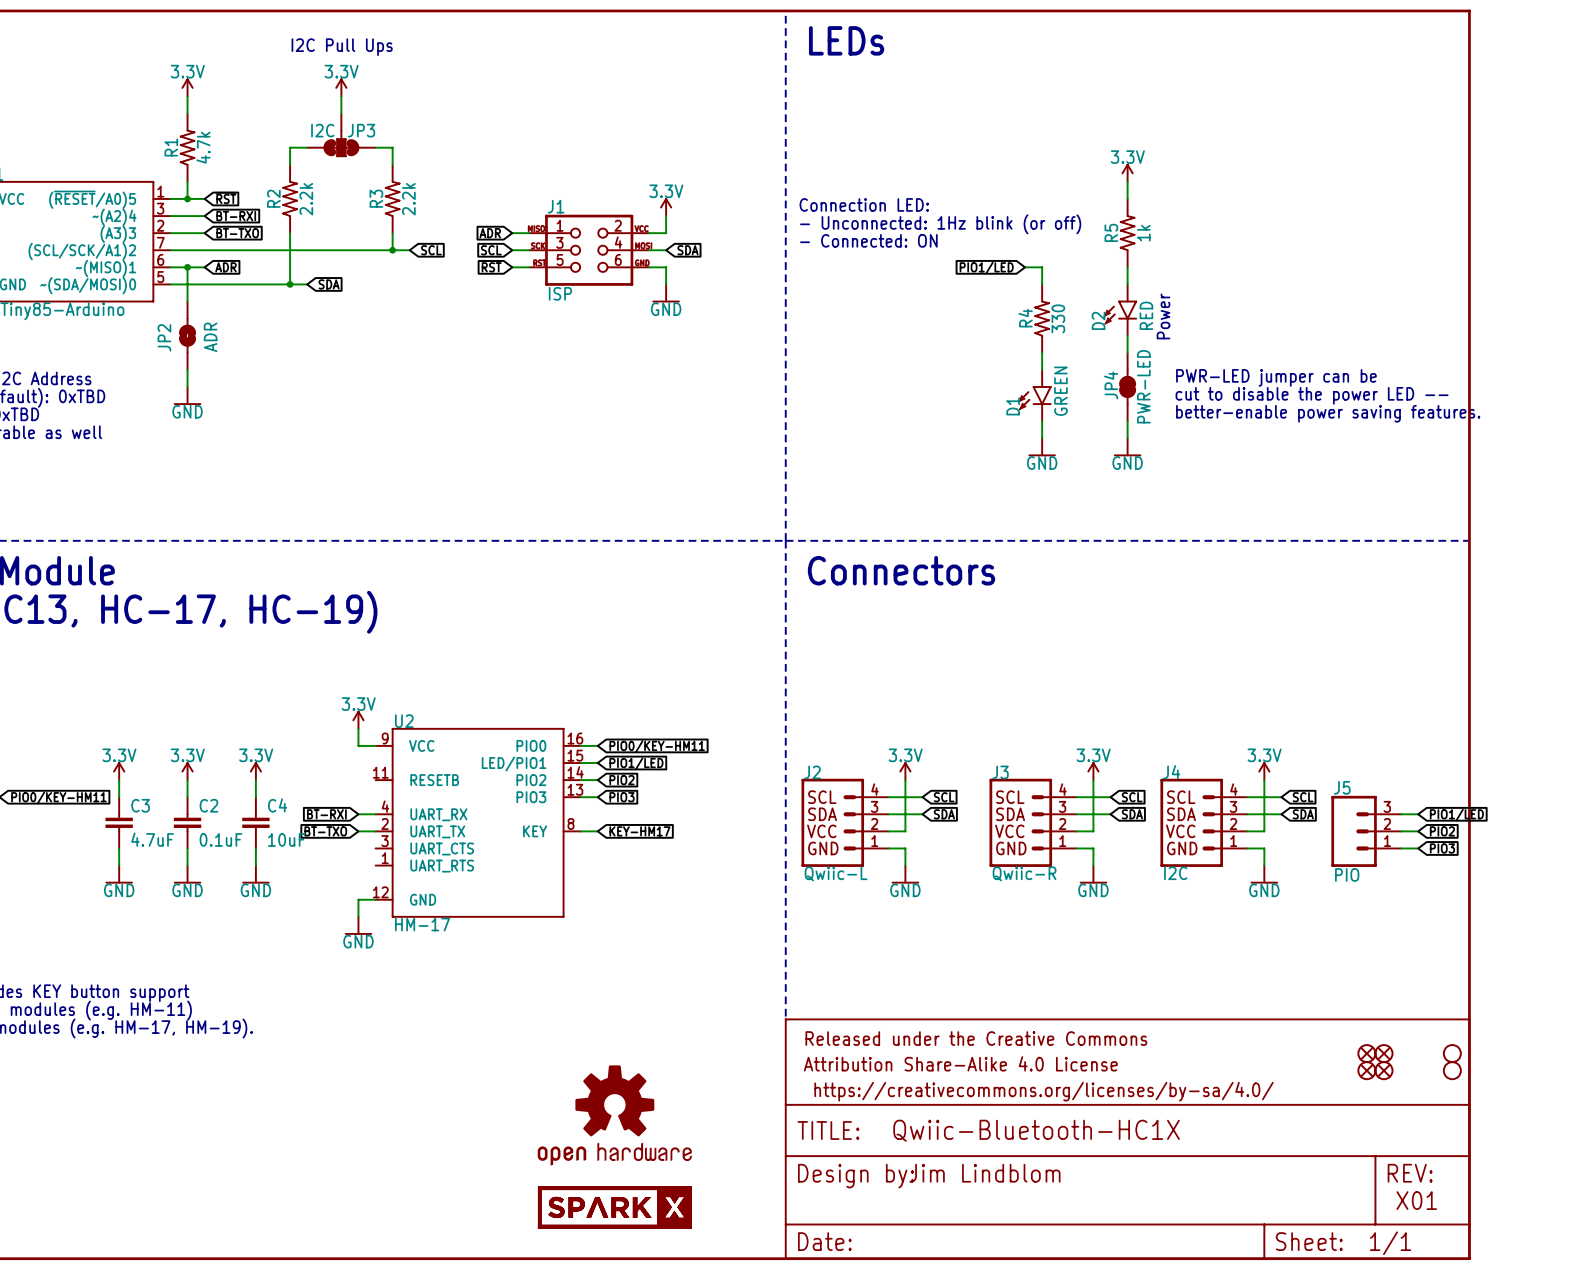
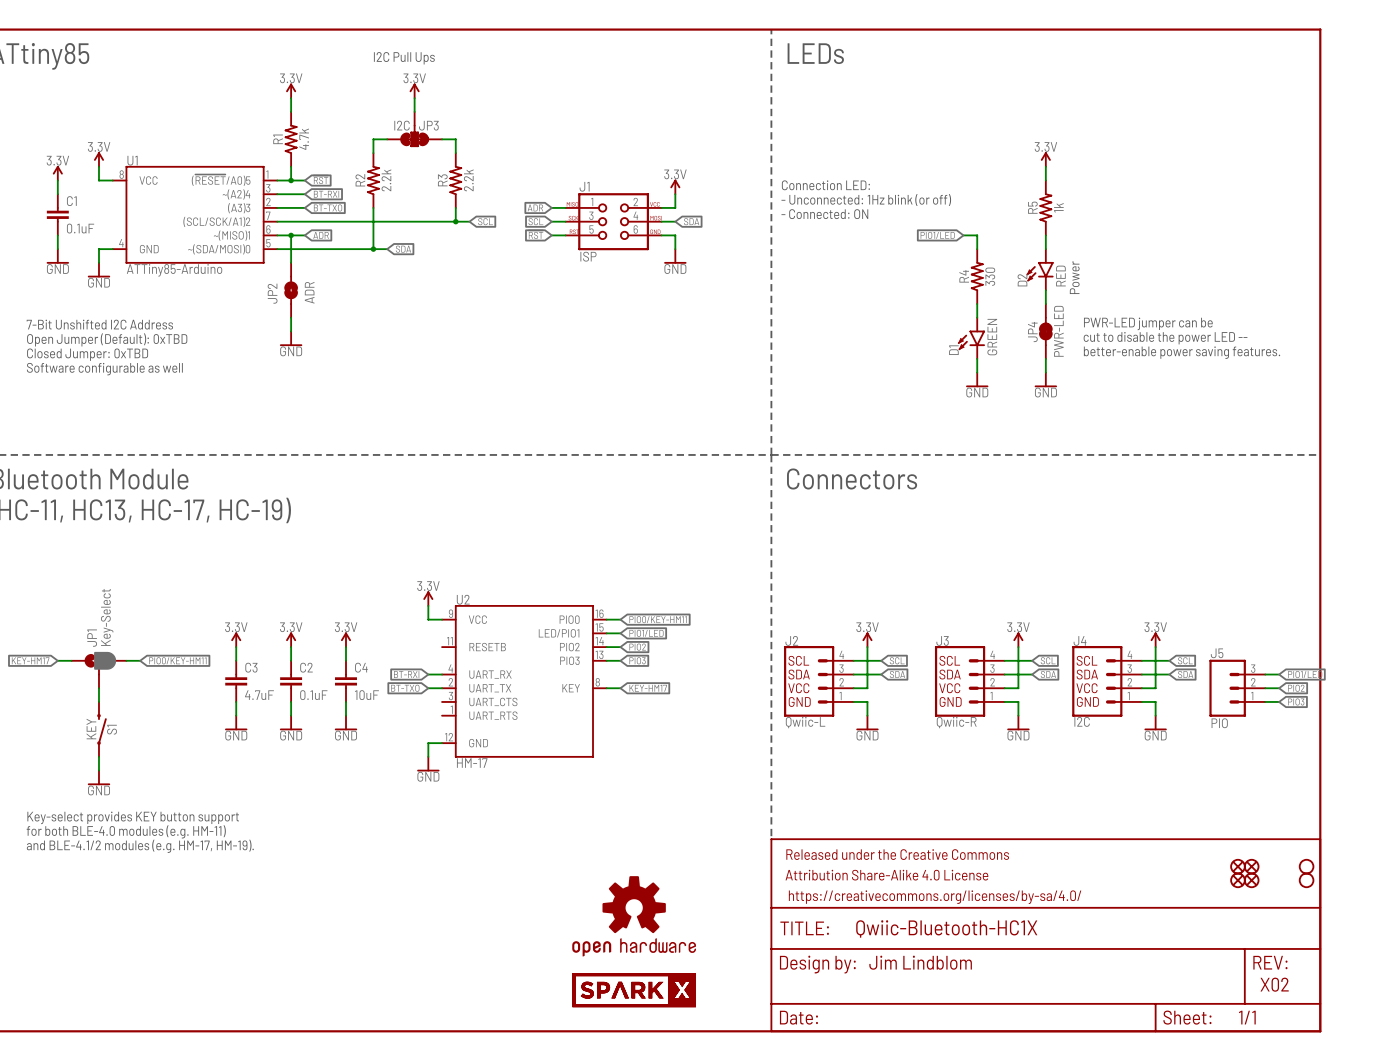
text: X01 (1416, 1200) -> X02 (1274, 984)

